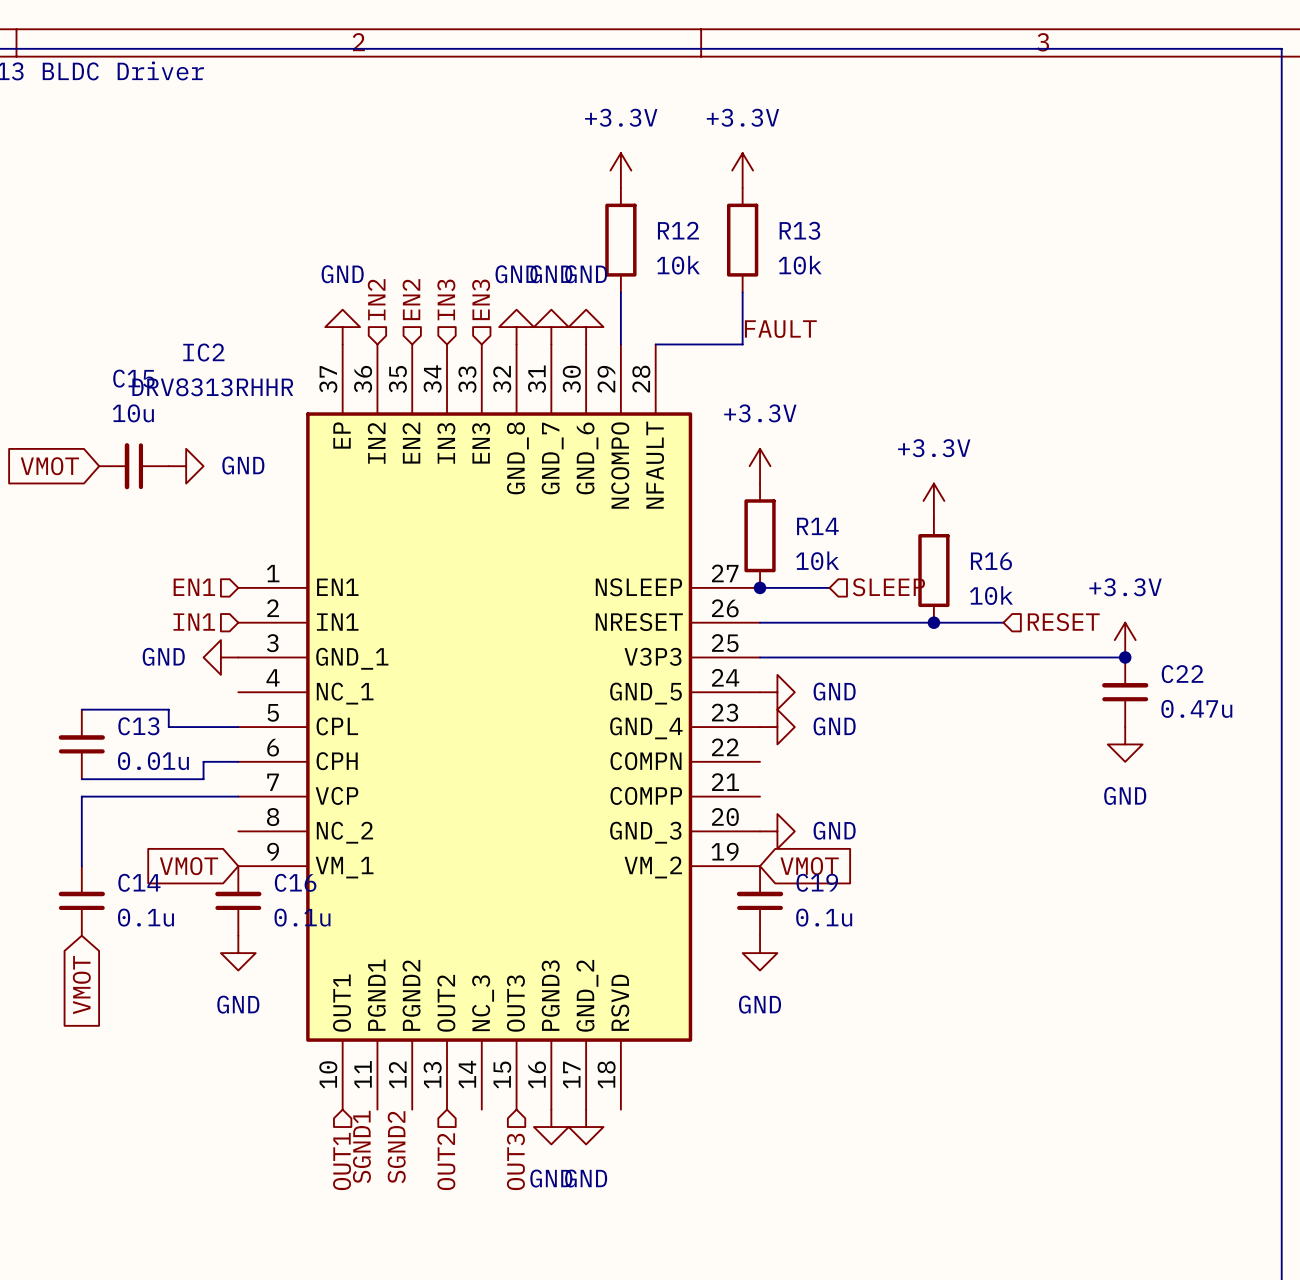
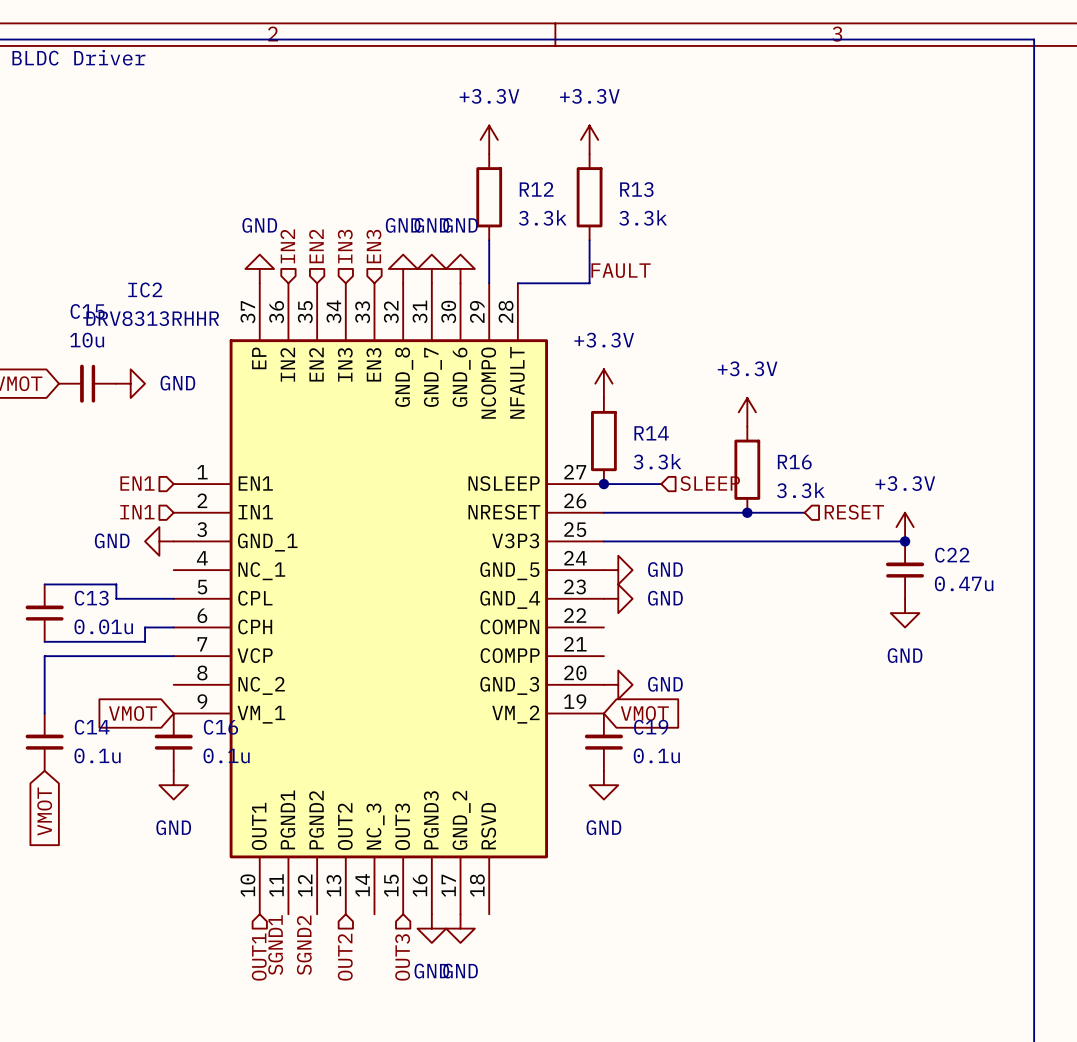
R12 value: 10k (678, 265) -> 3.3k (542, 217)
R13 value: 10k (800, 265) -> 3.3k (643, 217)
R14 value: 10k (817, 560) -> 3.3k (657, 461)
R16 value: 10k (991, 595) -> 3.3k (800, 490)

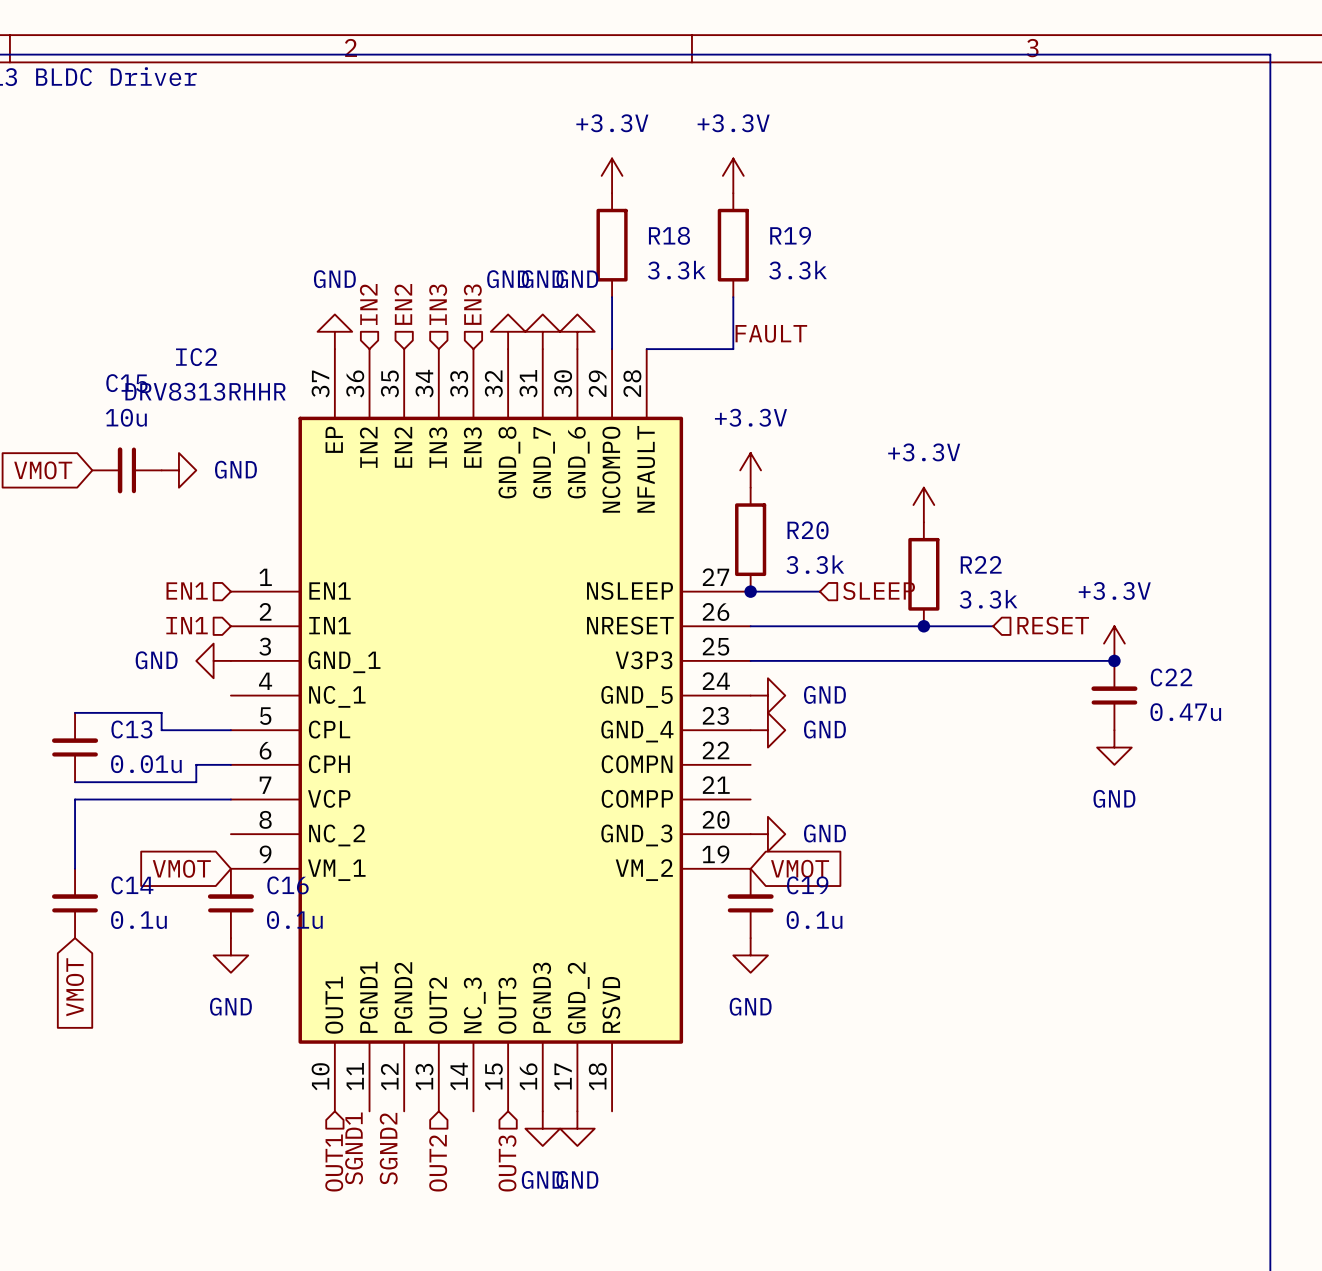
R12 name: R12 (536, 189) -> R18 (669, 235)
R13 name: R13 (636, 189) -> R19 (790, 235)
R14 name: R14 (651, 433) -> R20 (808, 530)
R16 name: R16 (794, 462) -> R22 (981, 564)

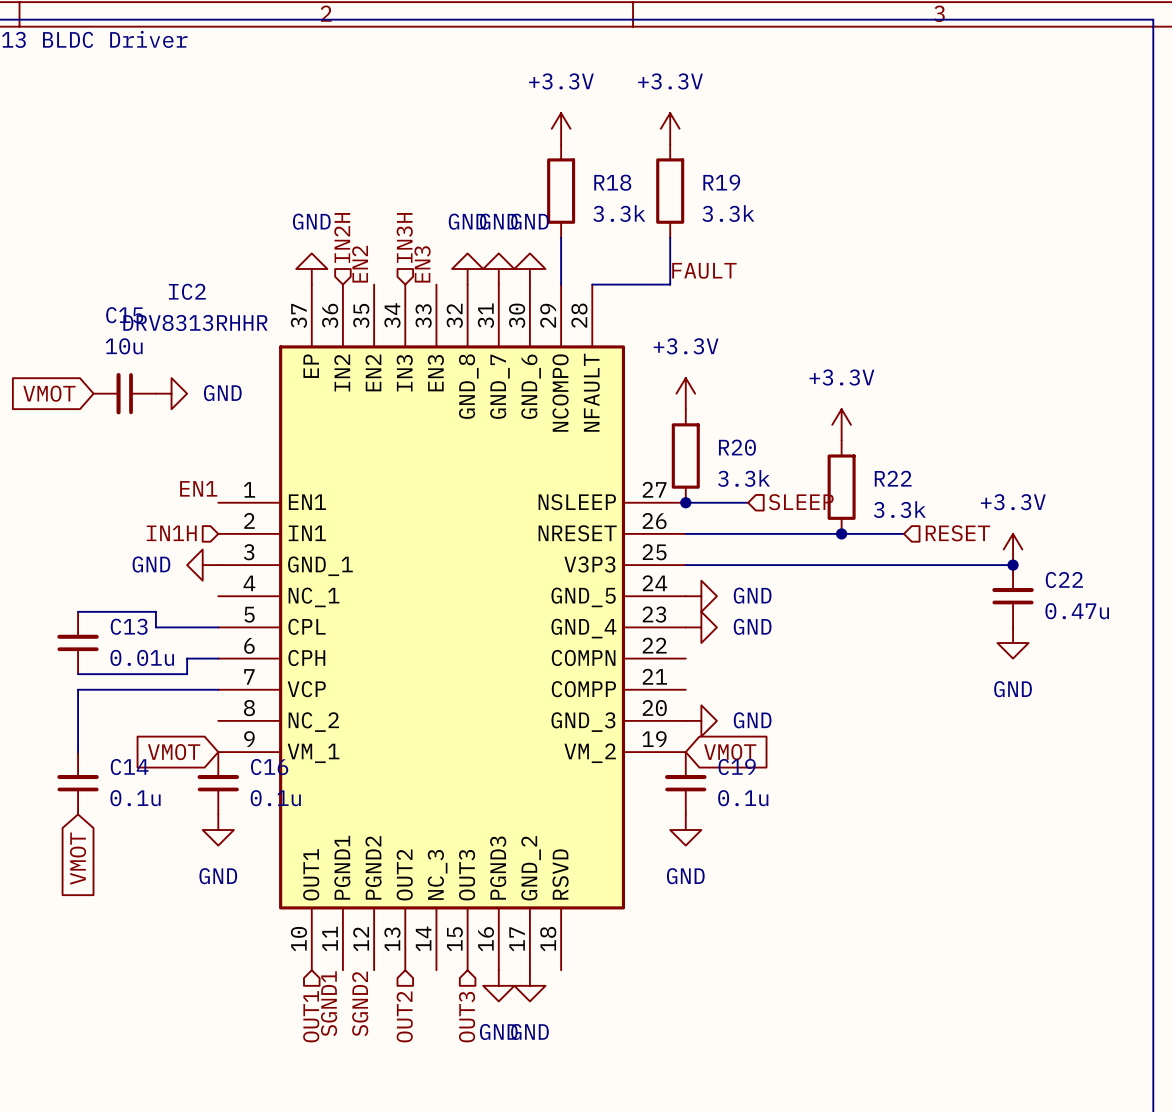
hierarchical label: IN2 (368, 304) -> IN2H (342, 237)
hierarchical label: EN2 (403, 304) -> none
hierarchical label: IN3 (438, 304) -> IN3H (404, 237)
hierarchical label: EN3 (472, 304) -> none
label: none -> EN2 (360, 264)
label: none -> EN3 (422, 264)
label: none -> EN1 (198, 488)
hierarchical label: EN1 (187, 590) -> none
hierarchical label: IN1 (187, 625) -> IN1H (171, 533)

